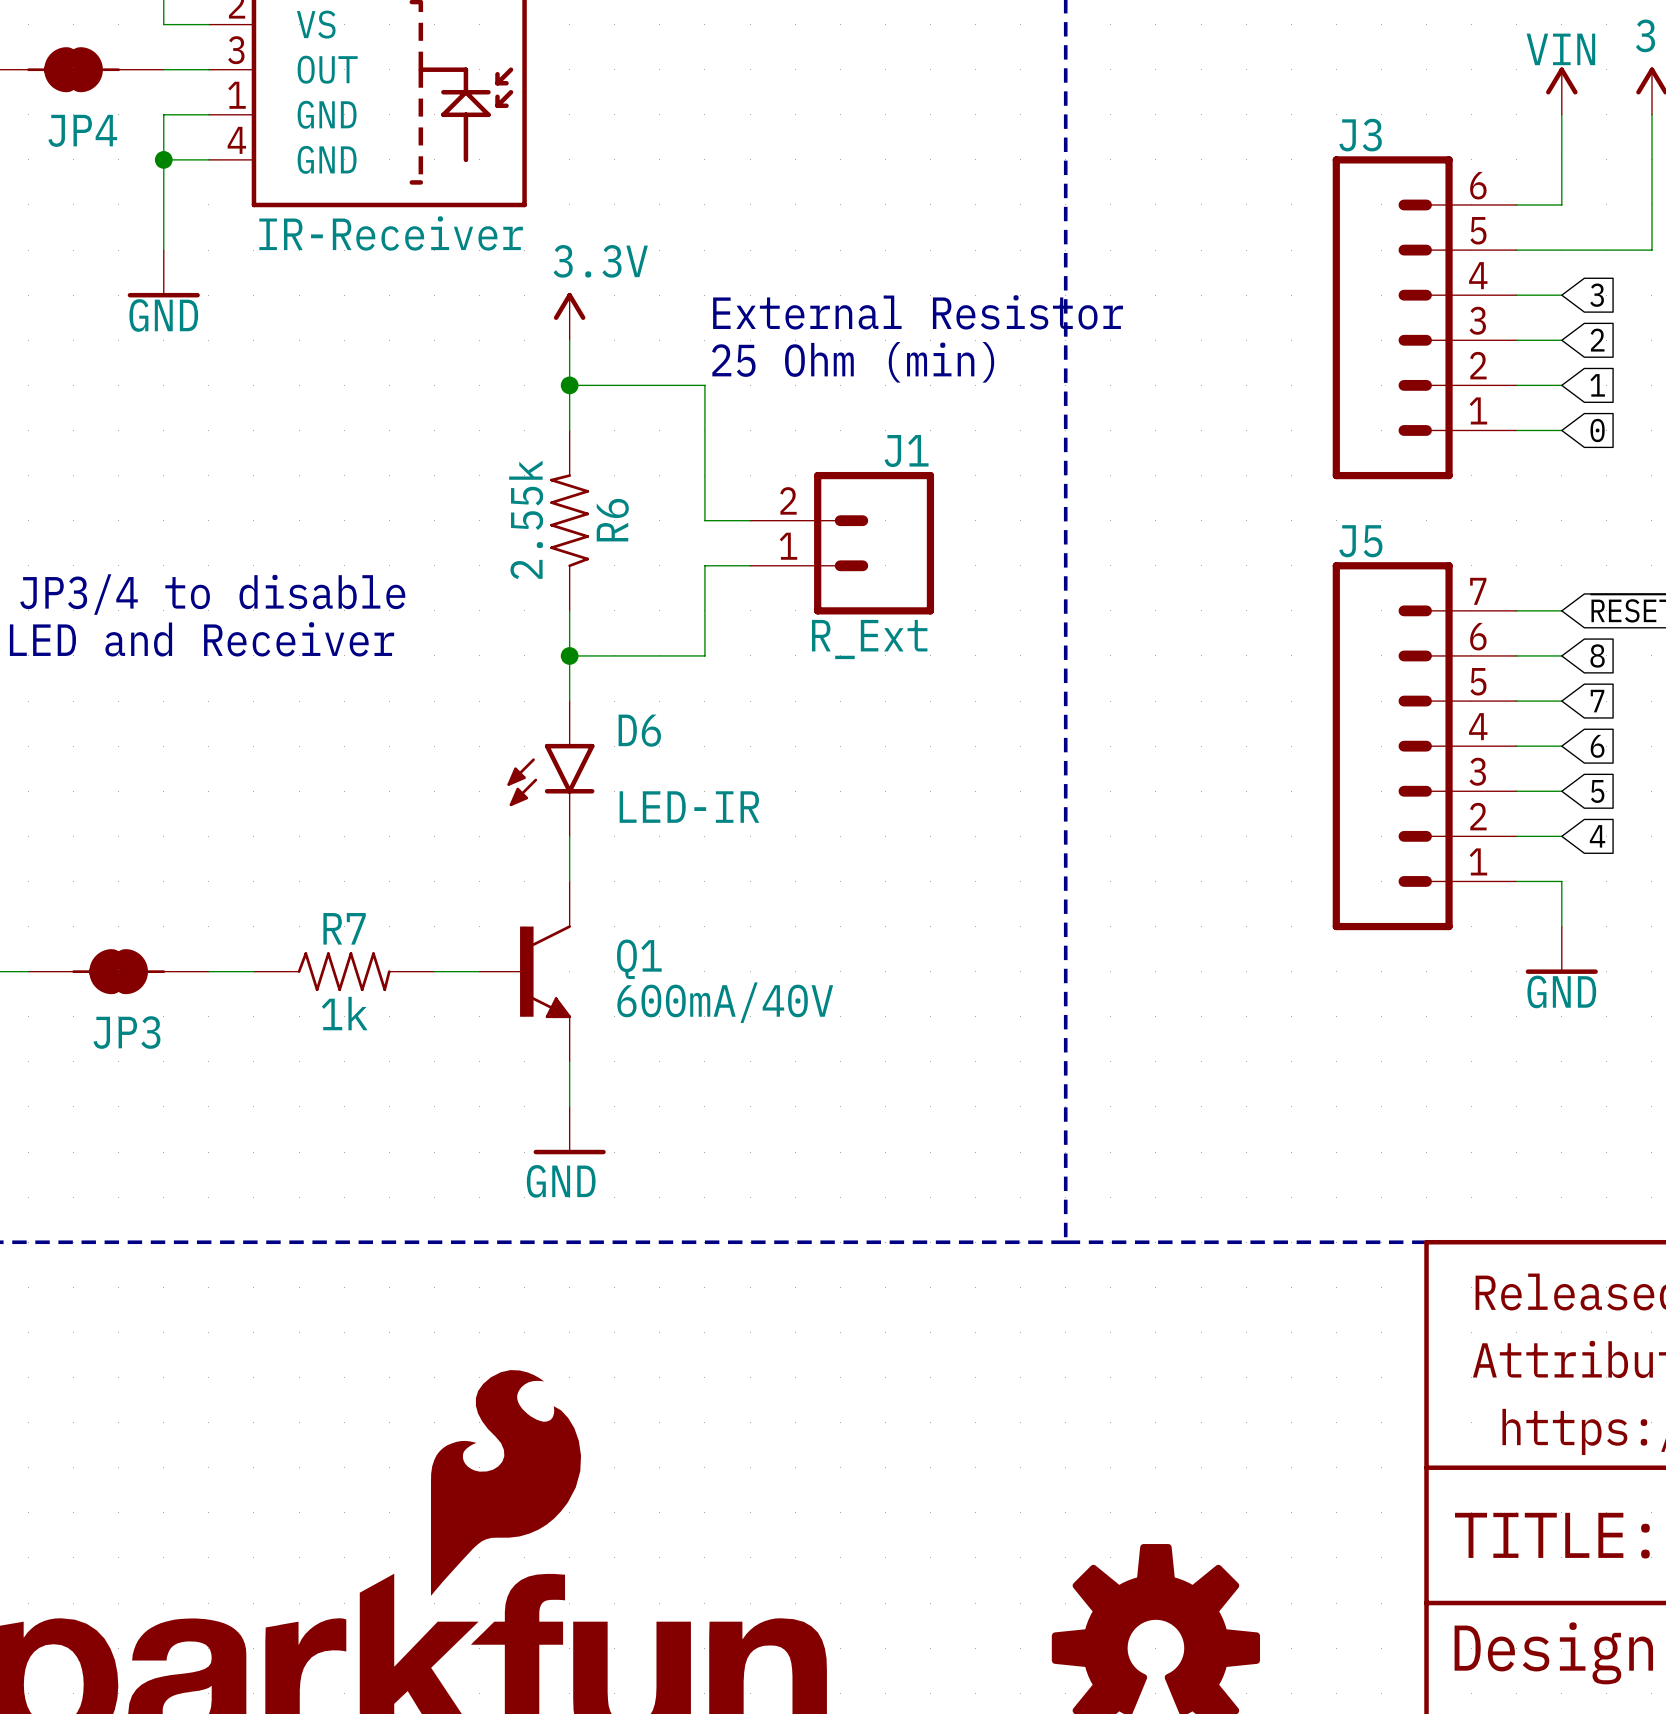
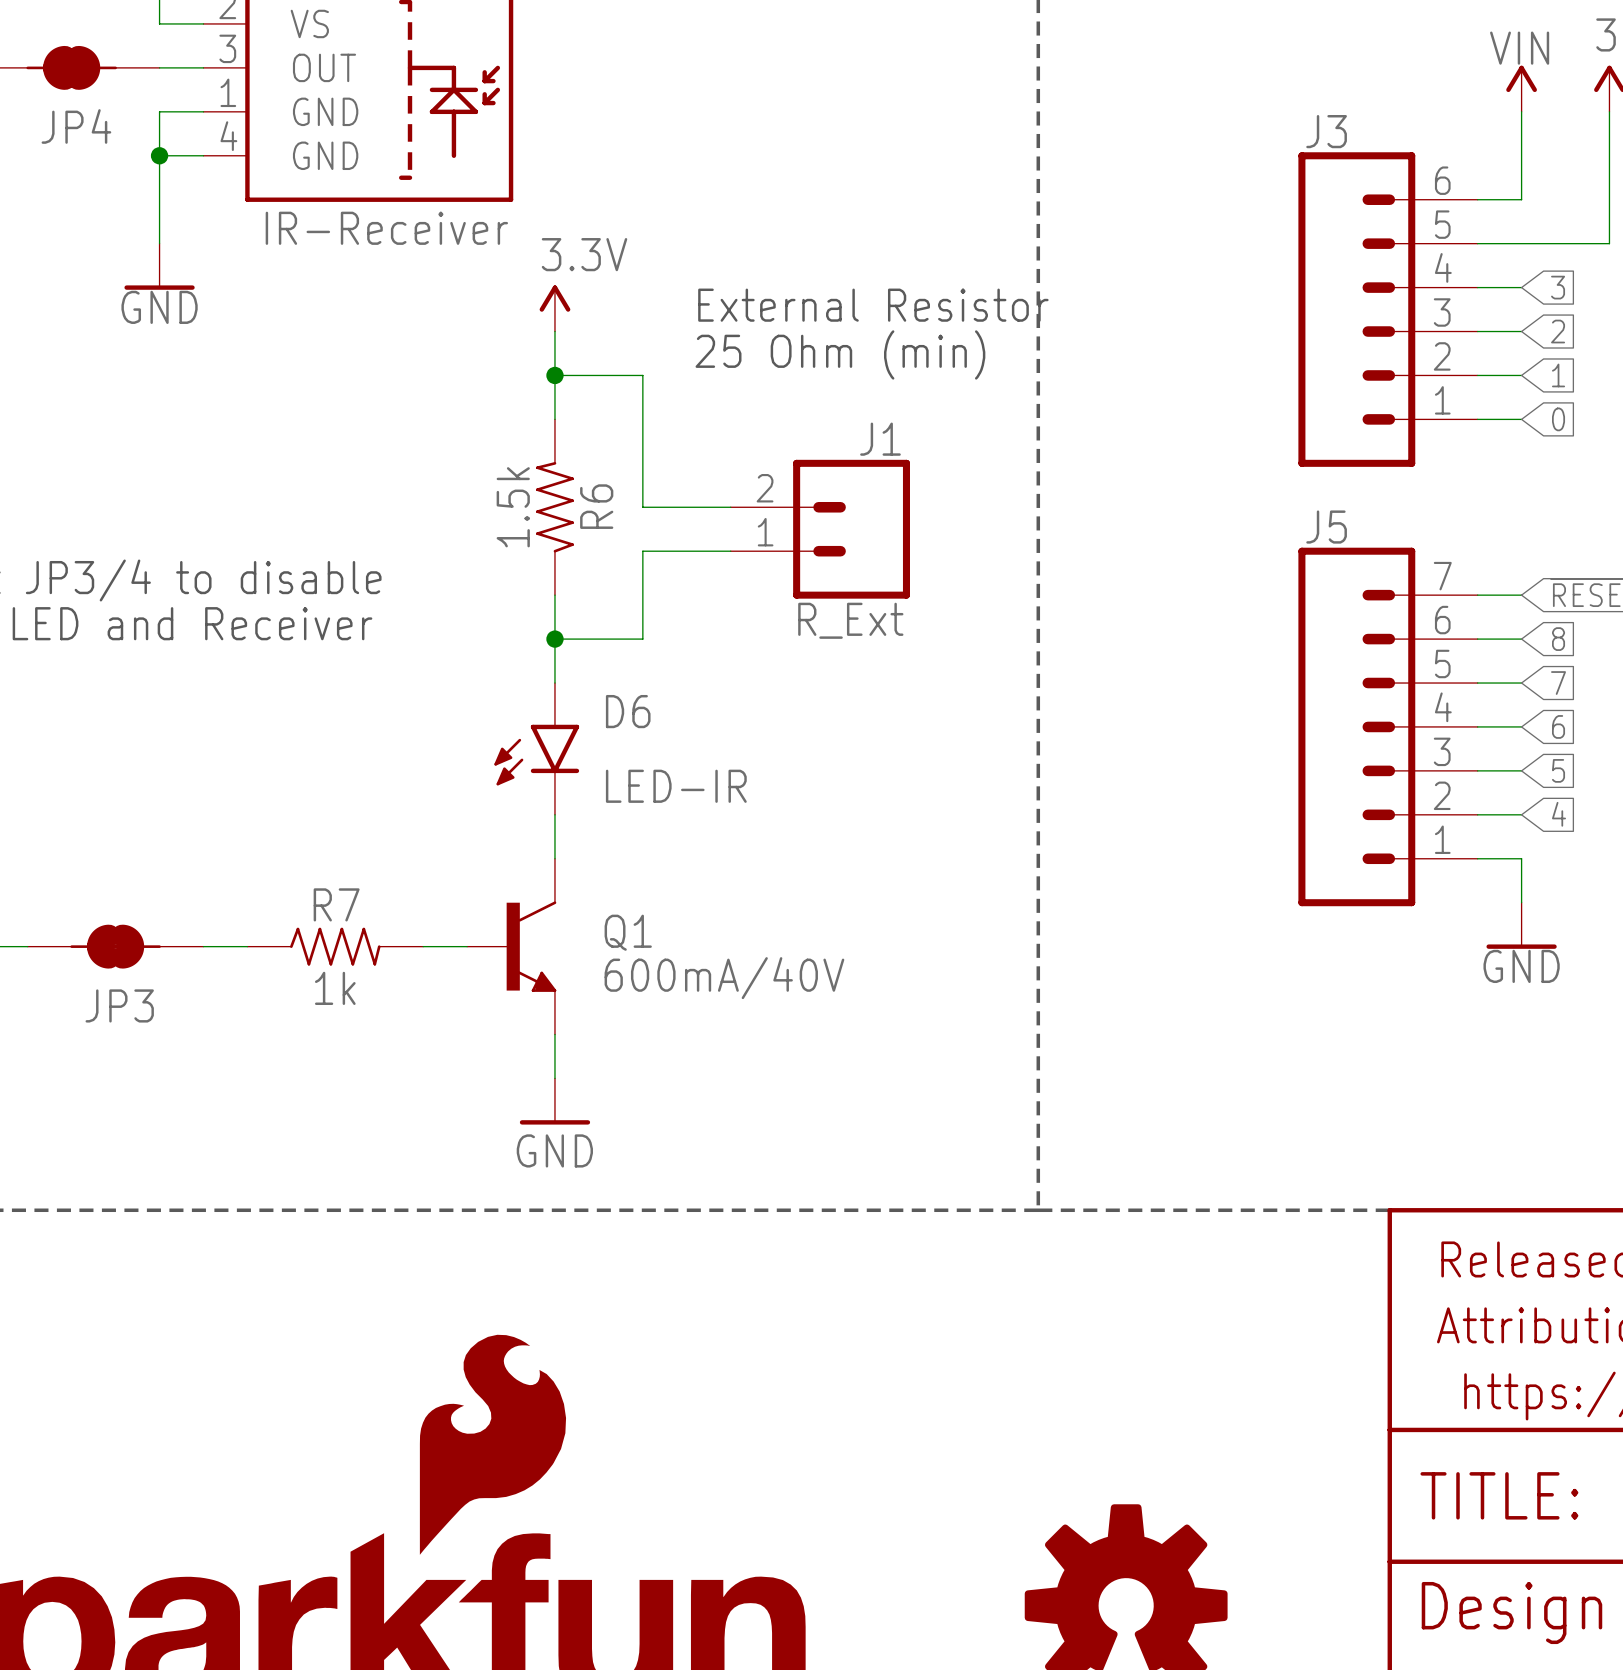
wire: (659, 385) (704, 385) (704, 520) -> (642, 375) (642, 507) (686, 507)
R6 value: 2.55k (526, 519) -> 1.5k (513, 507)
wire: (704, 565) (704, 655) (659, 655) -> (686, 551) (642, 551) (642, 639)

